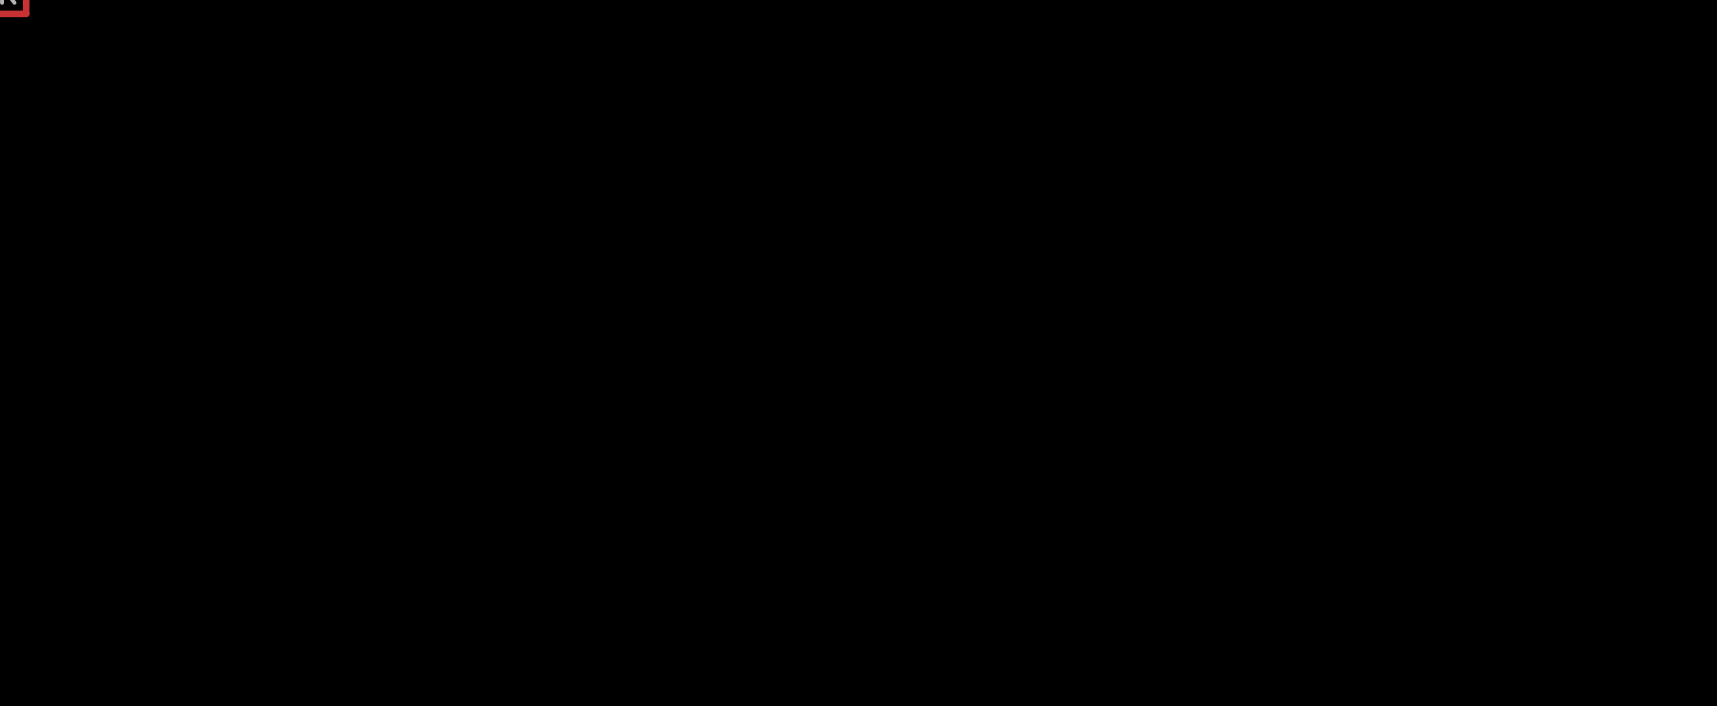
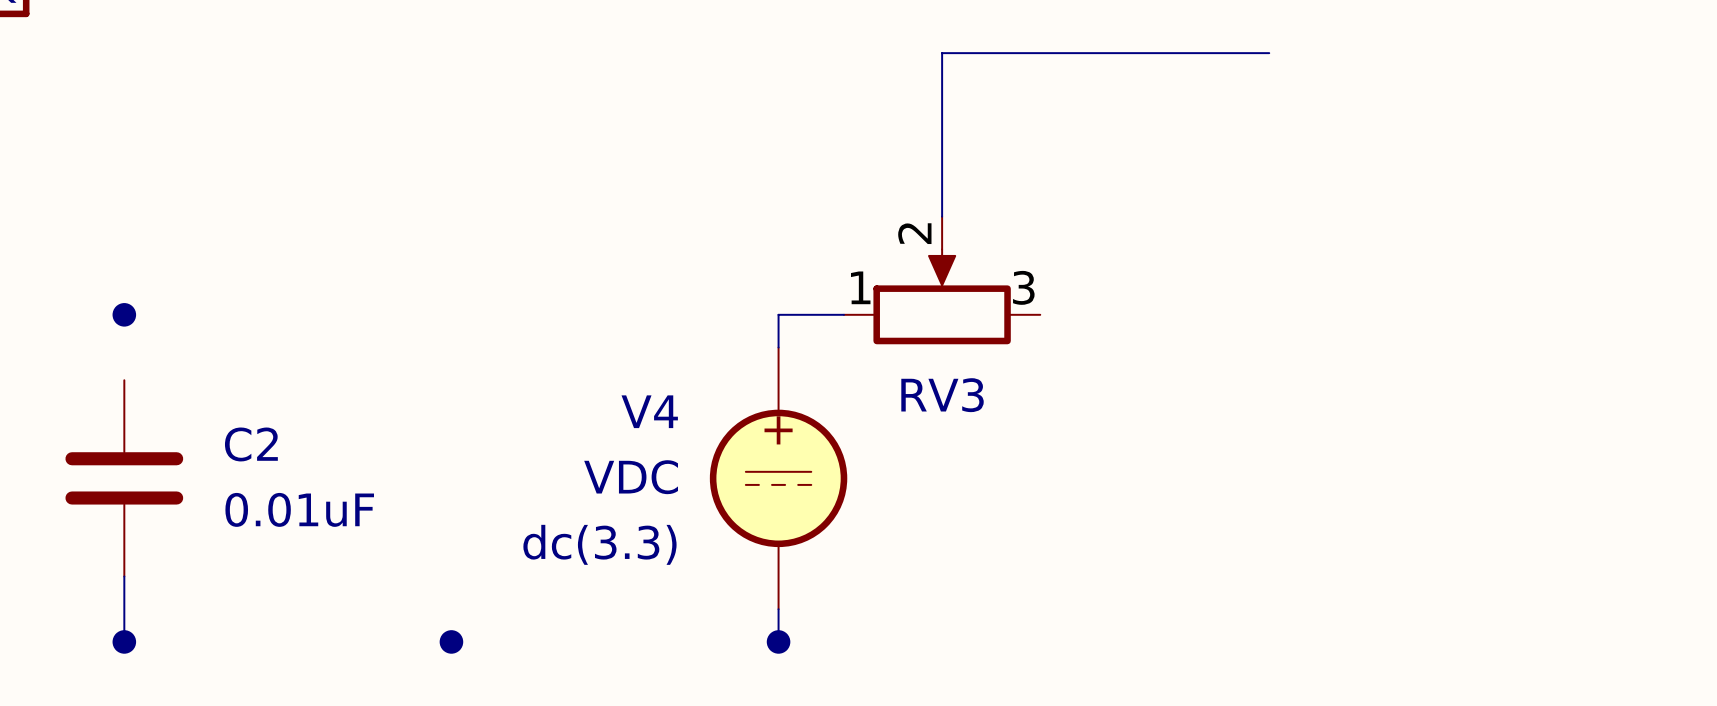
wire: none -> (1269, 53) (942, 53) (942, 216)
RV3: none -> (942, 280)
junction: none -> (124, 314)
wire: none -> (843, 314) (778, 314) (778, 347)
C2: none -> 0.01uF (124, 478)
V4: none -> VDC (778, 478)
wire: none -> (124, 576) (124, 641)
wire: none -> (778, 609) (778, 641)
junction: none -> (124, 641)
junction: none -> (451, 641)
junction: none -> (778, 641)

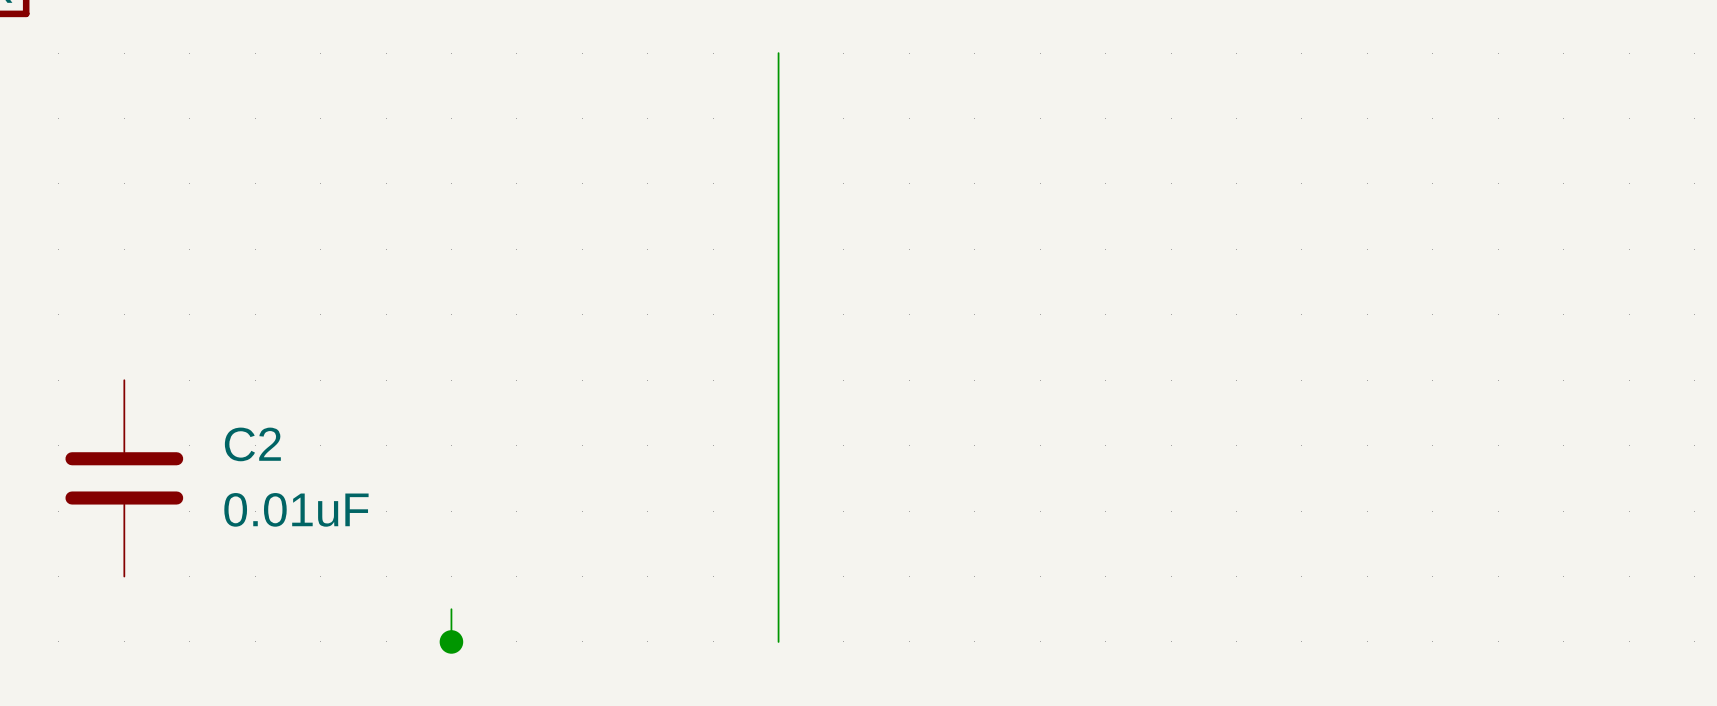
wire: (1269, 53) (942, 53) (942, 216) -> none
RV3: (942, 280) -> none
junction: (124, 314) -> none
wire: (778, 314) (843, 314) -> (778, 314) (778, 53)
V4: VDC (778, 478) -> none
wire: (124, 576) (124, 641) -> none
wire: none -> (451, 609) (451, 641)
junction: (124, 641) -> none
junction: (778, 641) -> none

